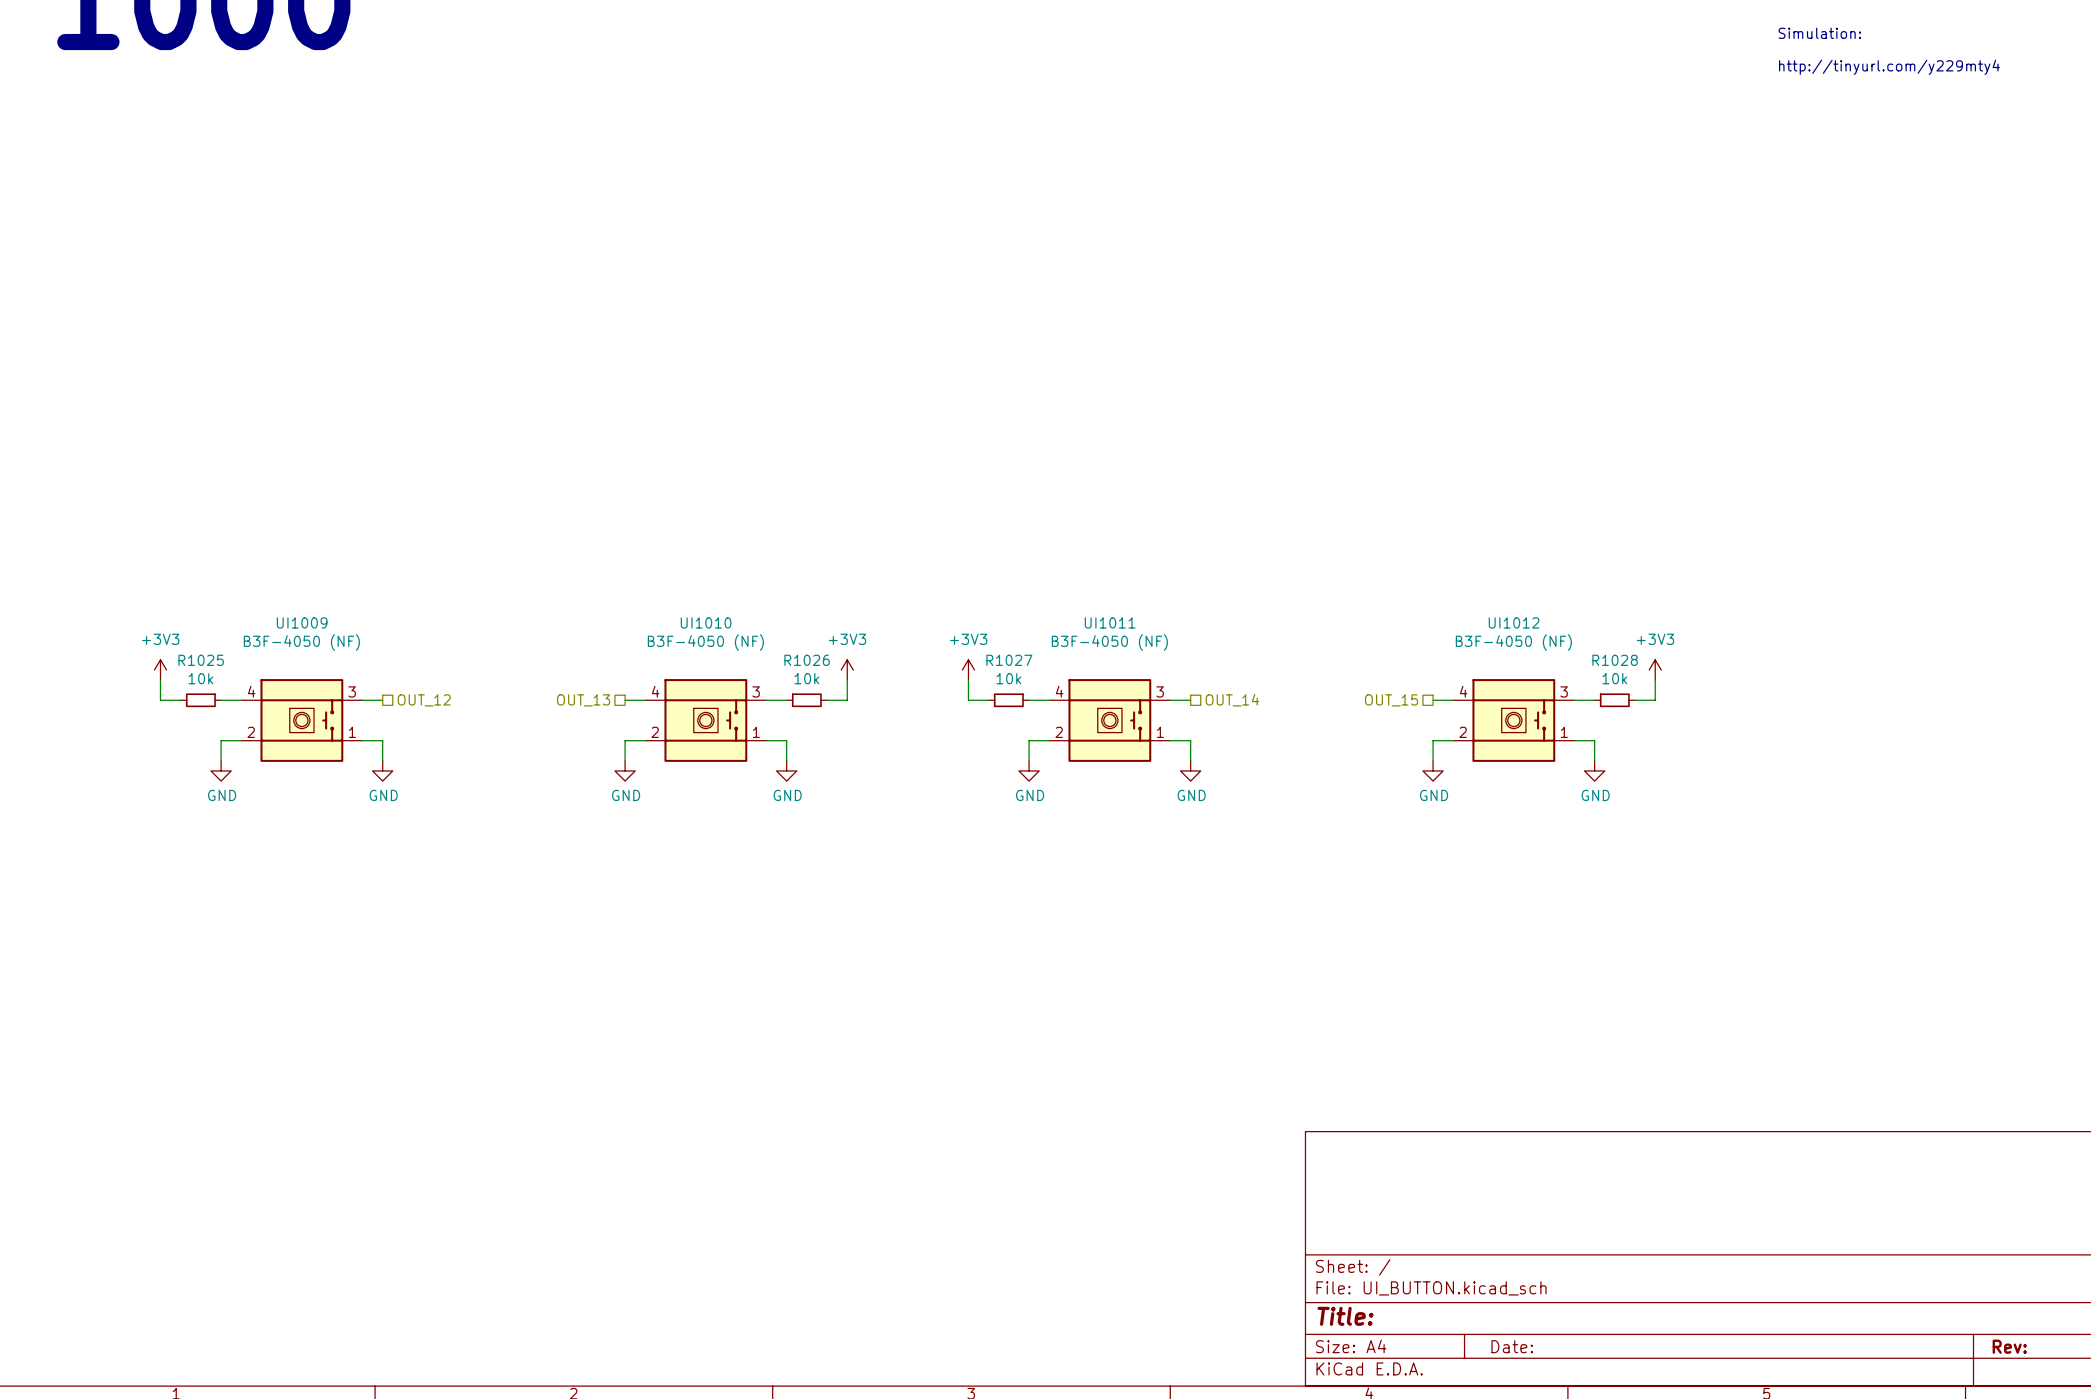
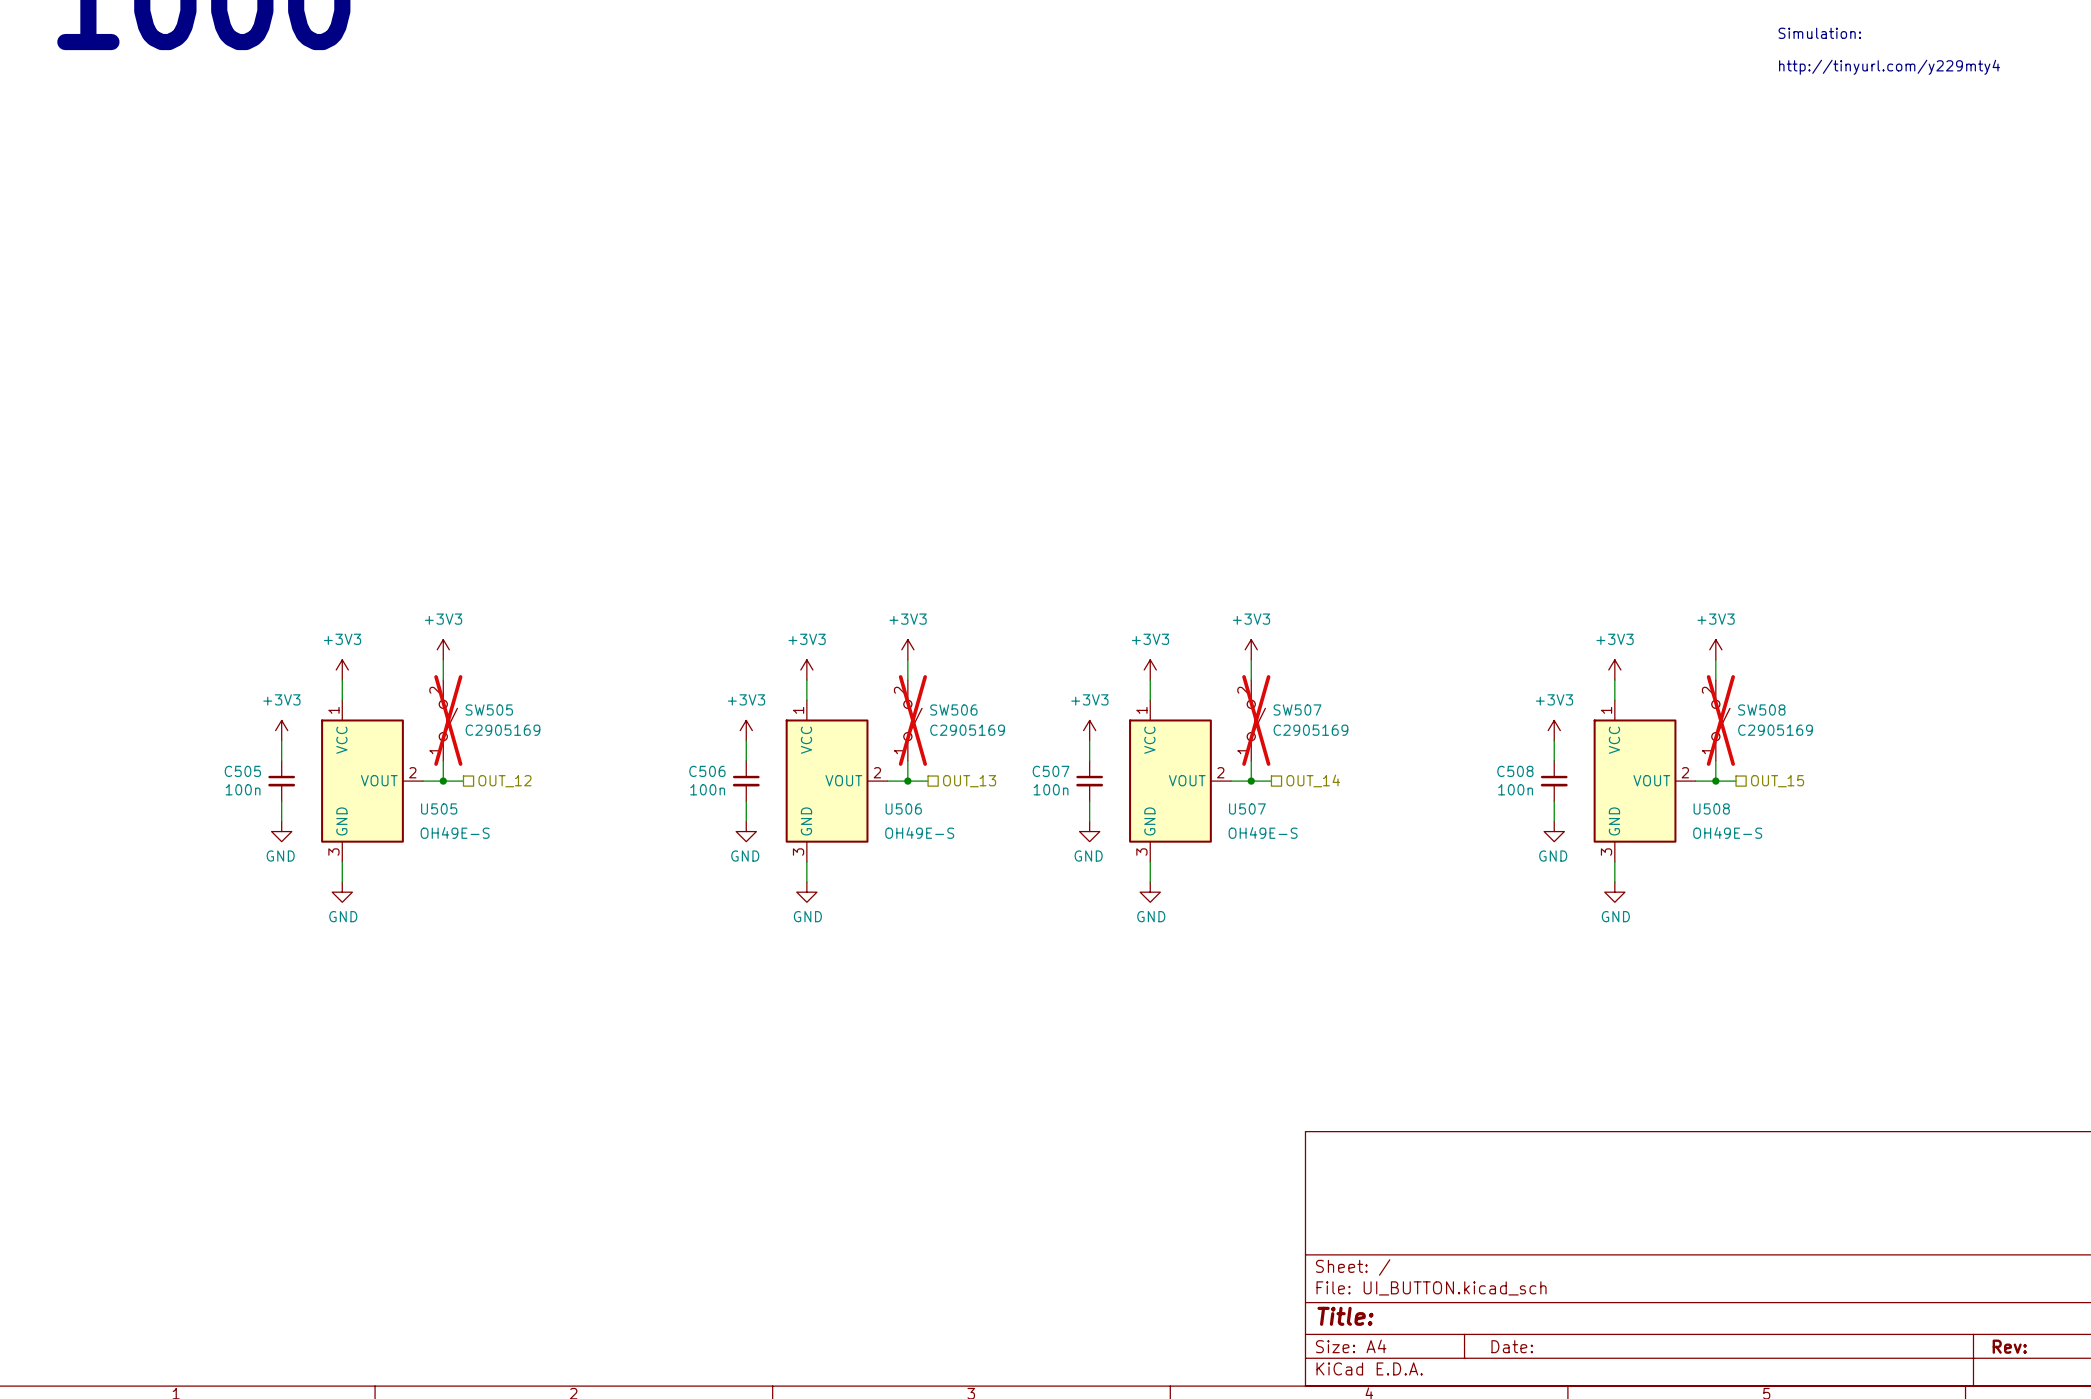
power symbol: none -> +3V3 (443, 649)
power symbol: none -> +3V3 (907, 649)
power symbol: none -> +3V3 (1251, 649)
power symbol: none -> +3V3 (1715, 649)
wire: none -> (443, 659) (443, 680)
wire: none -> (907, 659) (907, 680)
wire: none -> (1251, 659) (1251, 680)
wire: none -> (1715, 659) (1715, 680)
power symbol: +3V3 (160, 669) -> none
power symbol: none -> +3V3 (342, 669)
power symbol: none -> +3V3 (806, 669)
power symbol: +3V3 (847, 669) -> none
power symbol: +3V3 (968, 669) -> none
power symbol: none -> +3V3 (1150, 669)
power symbol: none -> +3V3 (1614, 669)
power symbol: +3V3 (1655, 669) -> none
wire: (160, 680) (160, 700) (180, 700) -> none
wire: none -> (806, 680) (806, 700)
wire: (847, 680) (847, 700) (827, 700) -> none
wire: (968, 680) (968, 700) (988, 700) -> none
wire: none -> (1614, 680) (1614, 700)
wire: (1655, 680) (1655, 700) (1635, 700) -> none
R1025: 10k (200, 700) -> none
wire: (221, 700) (241, 700) -> none
wire: (362, 700) (382, 700) -> none
hierarchical label position: OUT_12 (424, 700) -> OUT_12 (505, 781)
hierarchical label: OUT_13 (583, 700) -> none
wire: (625, 700) (645, 700) -> none
wire: (766, 700) (786, 700) -> none
R1026: 10k (806, 700) -> none
R1027: 10k (1008, 700) -> none
wire: (1029, 700) (1049, 700) -> none
wire: (1170, 700) (1190, 700) -> none
hierarchical label position: OUT_14 (1232, 700) -> OUT_14 (1313, 780)
hierarchical label: OUT_15 (1391, 700) -> none
wire: (1433, 700) (1453, 700) -> none
wire: (1574, 700) (1594, 700) -> none
R1028: 10k (1614, 700) -> none
UI1009: B3F-4050 (NF) (301, 720) -> none
SW505: none -> C2905169 (448, 720)
UI1010: B3F-4050 (NF) (705, 720) -> none
SW506: none -> C2905169 (912, 720)
UI1011: B3F-4050 (NF) (1109, 720) -> none
SW507: none -> C2905169 (1256, 720)
UI1012: B3F-4050 (NF) (1513, 720) -> none
SW508: none -> C2905169 (1720, 720)
power symbol: none -> +3V3 (281, 730)
power symbol: none -> +3V3 (746, 730)
power symbol: none -> +3V3 (1089, 730)
power symbol: none -> +3V3 (1554, 730)
wire: (241, 740) (221, 740) (221, 760) -> none
wire: (645, 740) (625, 740) (625, 760) -> none
wire: (766, 740) (786, 740) (786, 760) -> none
wire: (1049, 740) (1029, 740) (1029, 760) -> none
wire: (1453, 740) (1433, 740) (1433, 760) -> none
wire: (1574, 740) (1594, 740) (1594, 760) -> none
wire: none -> (443, 760) (443, 781)
wire: none -> (907, 760) (907, 781)
wire: none -> (1251, 760) (1251, 781)
wire: none -> (1715, 760) (1715, 781)
power symbol: GND (221, 770) -> none
power symbol: GND (382, 770) -> none
power symbol: GND (625, 770) -> none
power symbol: GND (786, 770) -> none
power symbol: GND (1029, 770) -> none
power symbol: GND (1190, 770) -> none
power symbol: GND (1433, 770) -> none
power symbol: GND (1594, 770) -> none
C505: none -> 100n (281, 781)
U505: none -> OH49E-S (372, 781)
wire: none -> (423, 781) (463, 781)
junction: none -> (443, 781)
C506: none -> 100n (746, 781)
U506: none -> OH49E-S (836, 781)
wire: none -> (887, 781) (928, 781)
junction: none -> (907, 781)
hierarchical label: none -> OUT_13 (969, 781)
C507: none -> 100n (1089, 781)
U507: none -> OH49E-S (1180, 781)
wire: none -> (1231, 781) (1271, 781)
junction: none -> (1251, 781)
C508: none -> 100n (1554, 781)
U508: none -> OH49E-S (1644, 781)
wire: none -> (1695, 781) (1736, 781)
junction: none -> (1715, 781)
hierarchical label: none -> OUT_15 (1777, 781)
wire: none -> (281, 801) (281, 821)
wire: none -> (746, 801) (746, 821)
wire: none -> (1089, 801) (1089, 821)
wire: none -> (1554, 801) (1554, 821)
power symbol: none -> GND (281, 831)
power symbol: none -> GND (746, 831)
power symbol: none -> GND (1089, 831)
power symbol: none -> GND (1554, 831)
wire: none -> (342, 861) (342, 882)
wire: none -> (806, 861) (806, 882)
wire: none -> (1150, 861) (1150, 882)
wire: none -> (1614, 861) (1614, 882)
power symbol: none -> GND (342, 892)
power symbol: none -> GND (806, 892)
power symbol: none -> GND (1150, 892)
power symbol: none -> GND (1614, 892)

